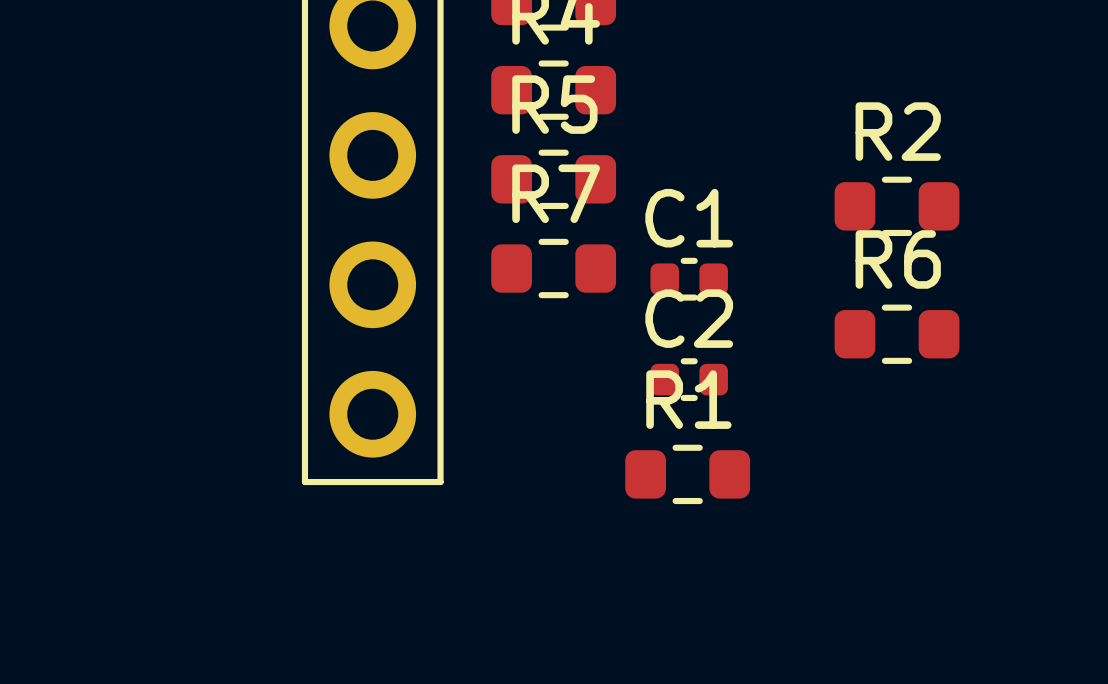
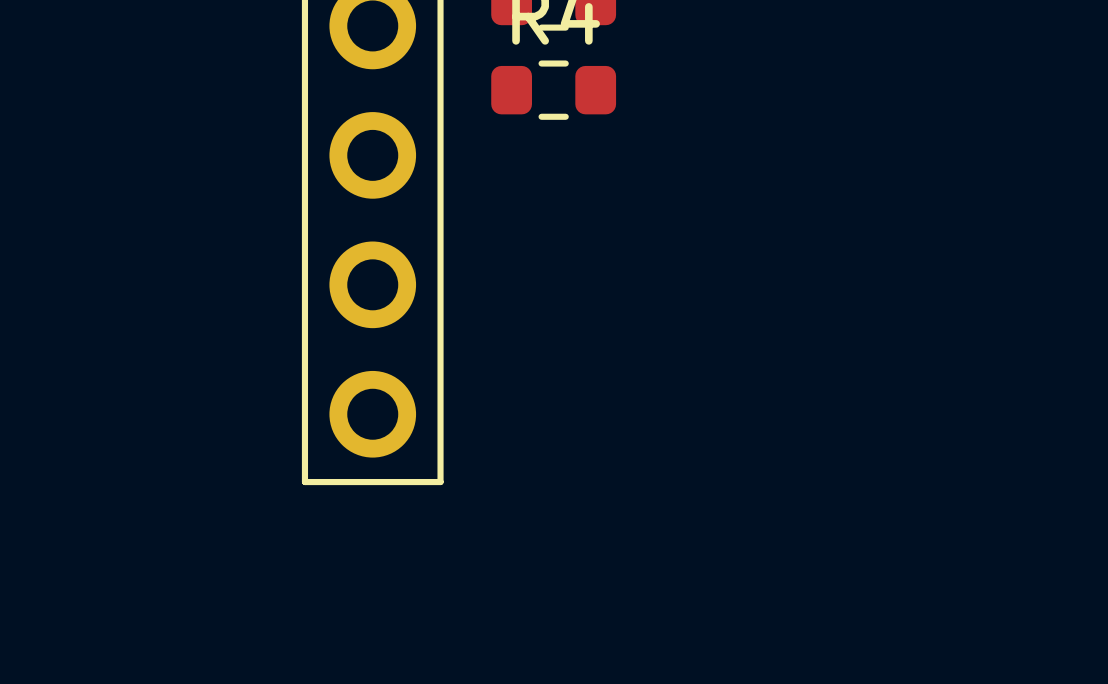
R5: (553, 179) -> none
R2: (897, 206) -> none
R7: (553, 268) -> none
C1: (689, 279) -> none
R6: (897, 334) -> none
C2: (689, 379) -> none
R1: (687, 474) -> none

